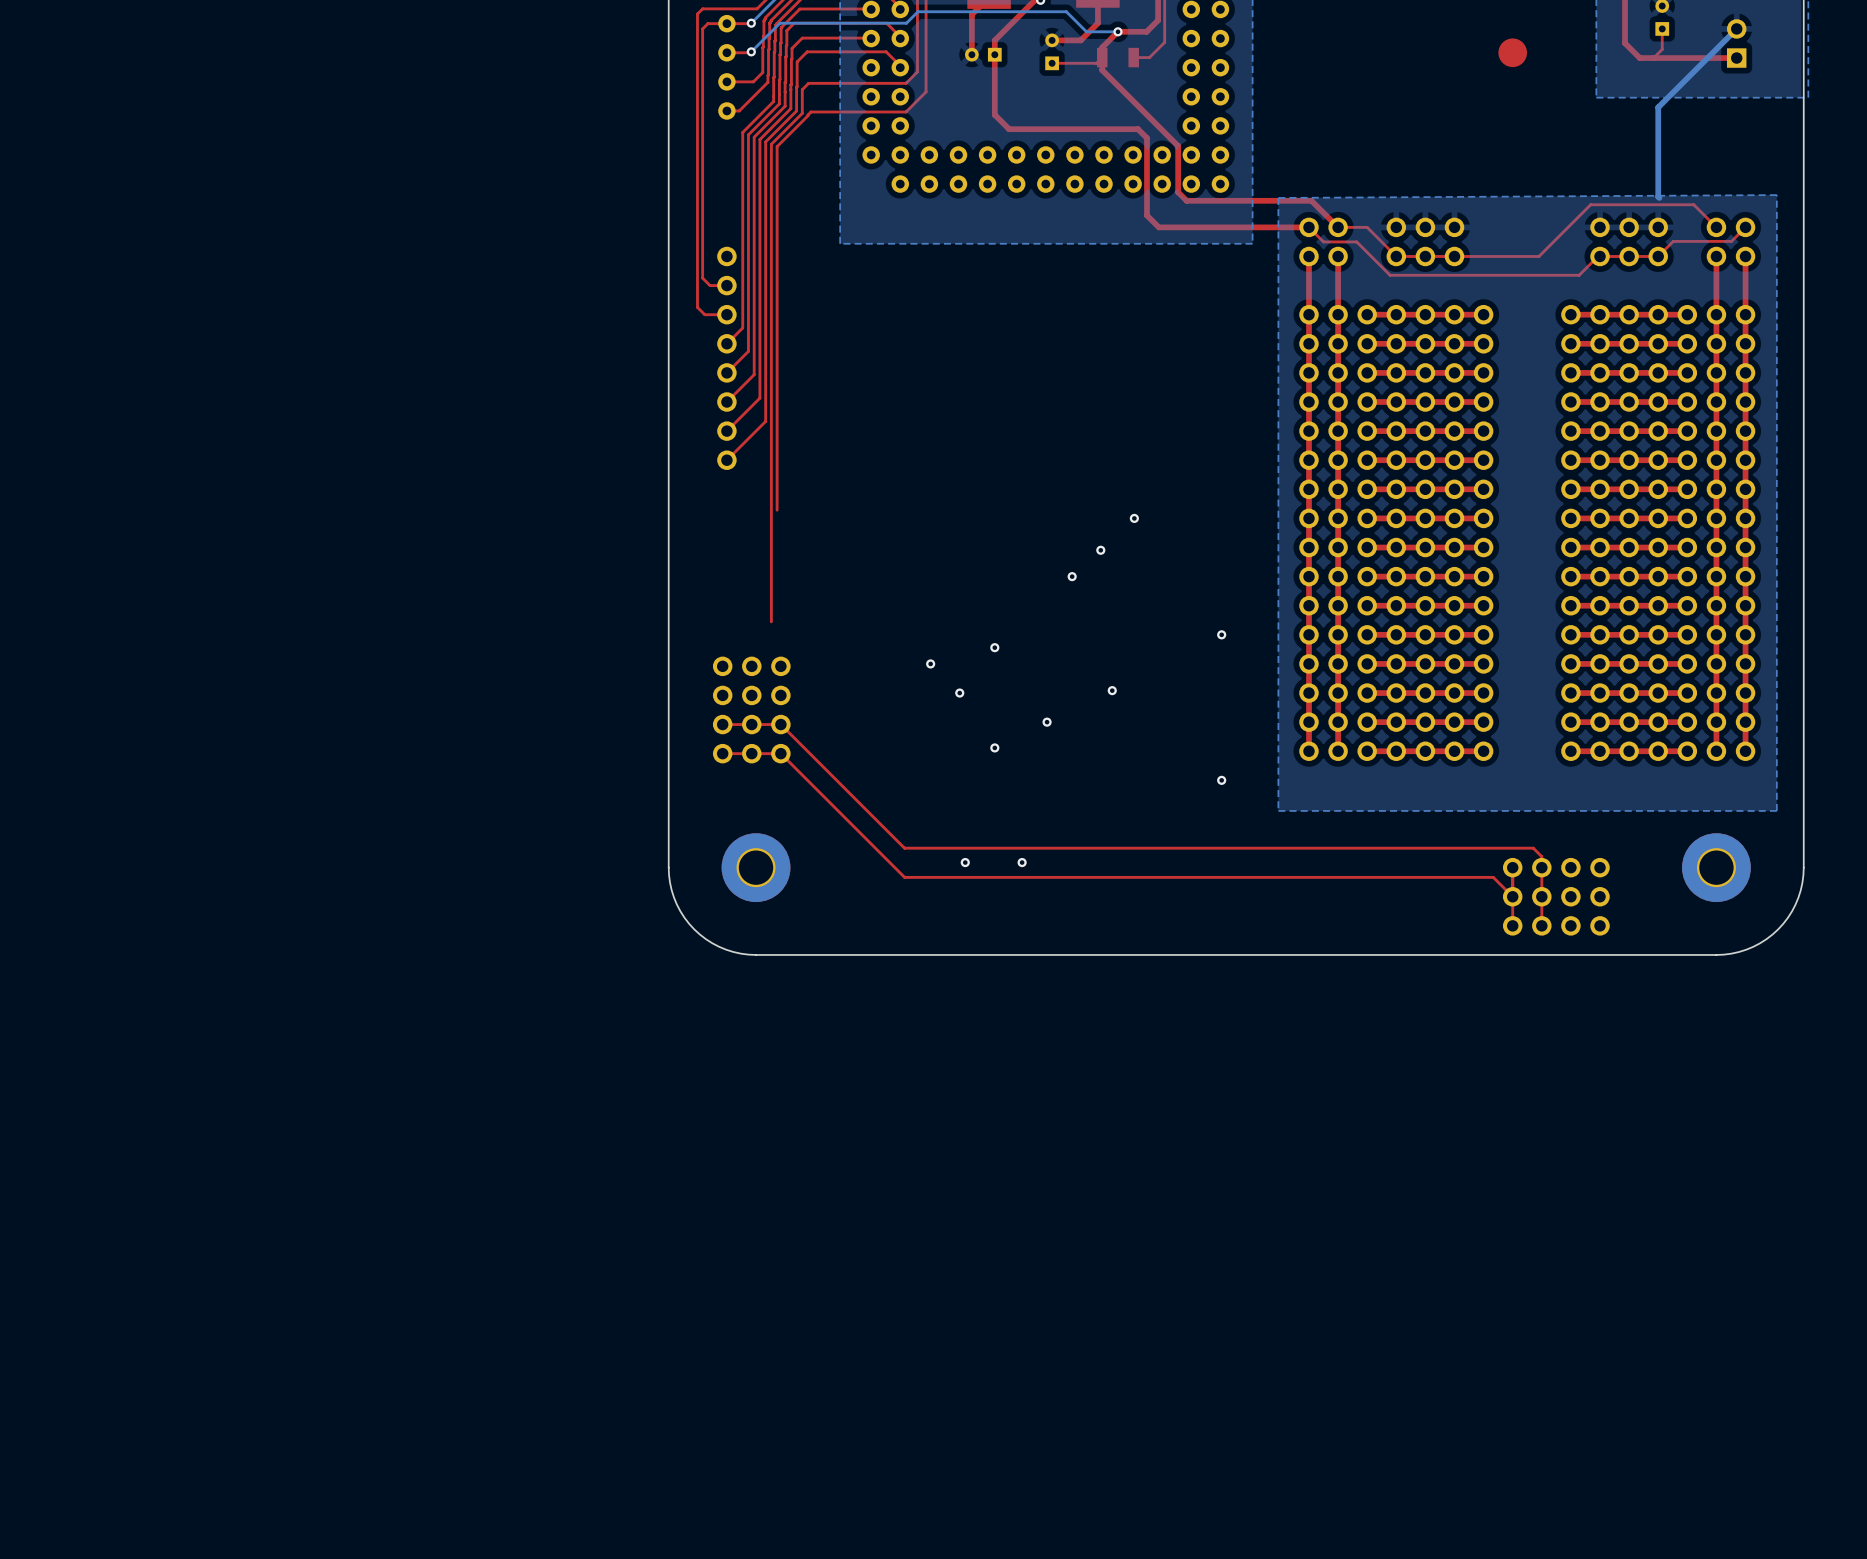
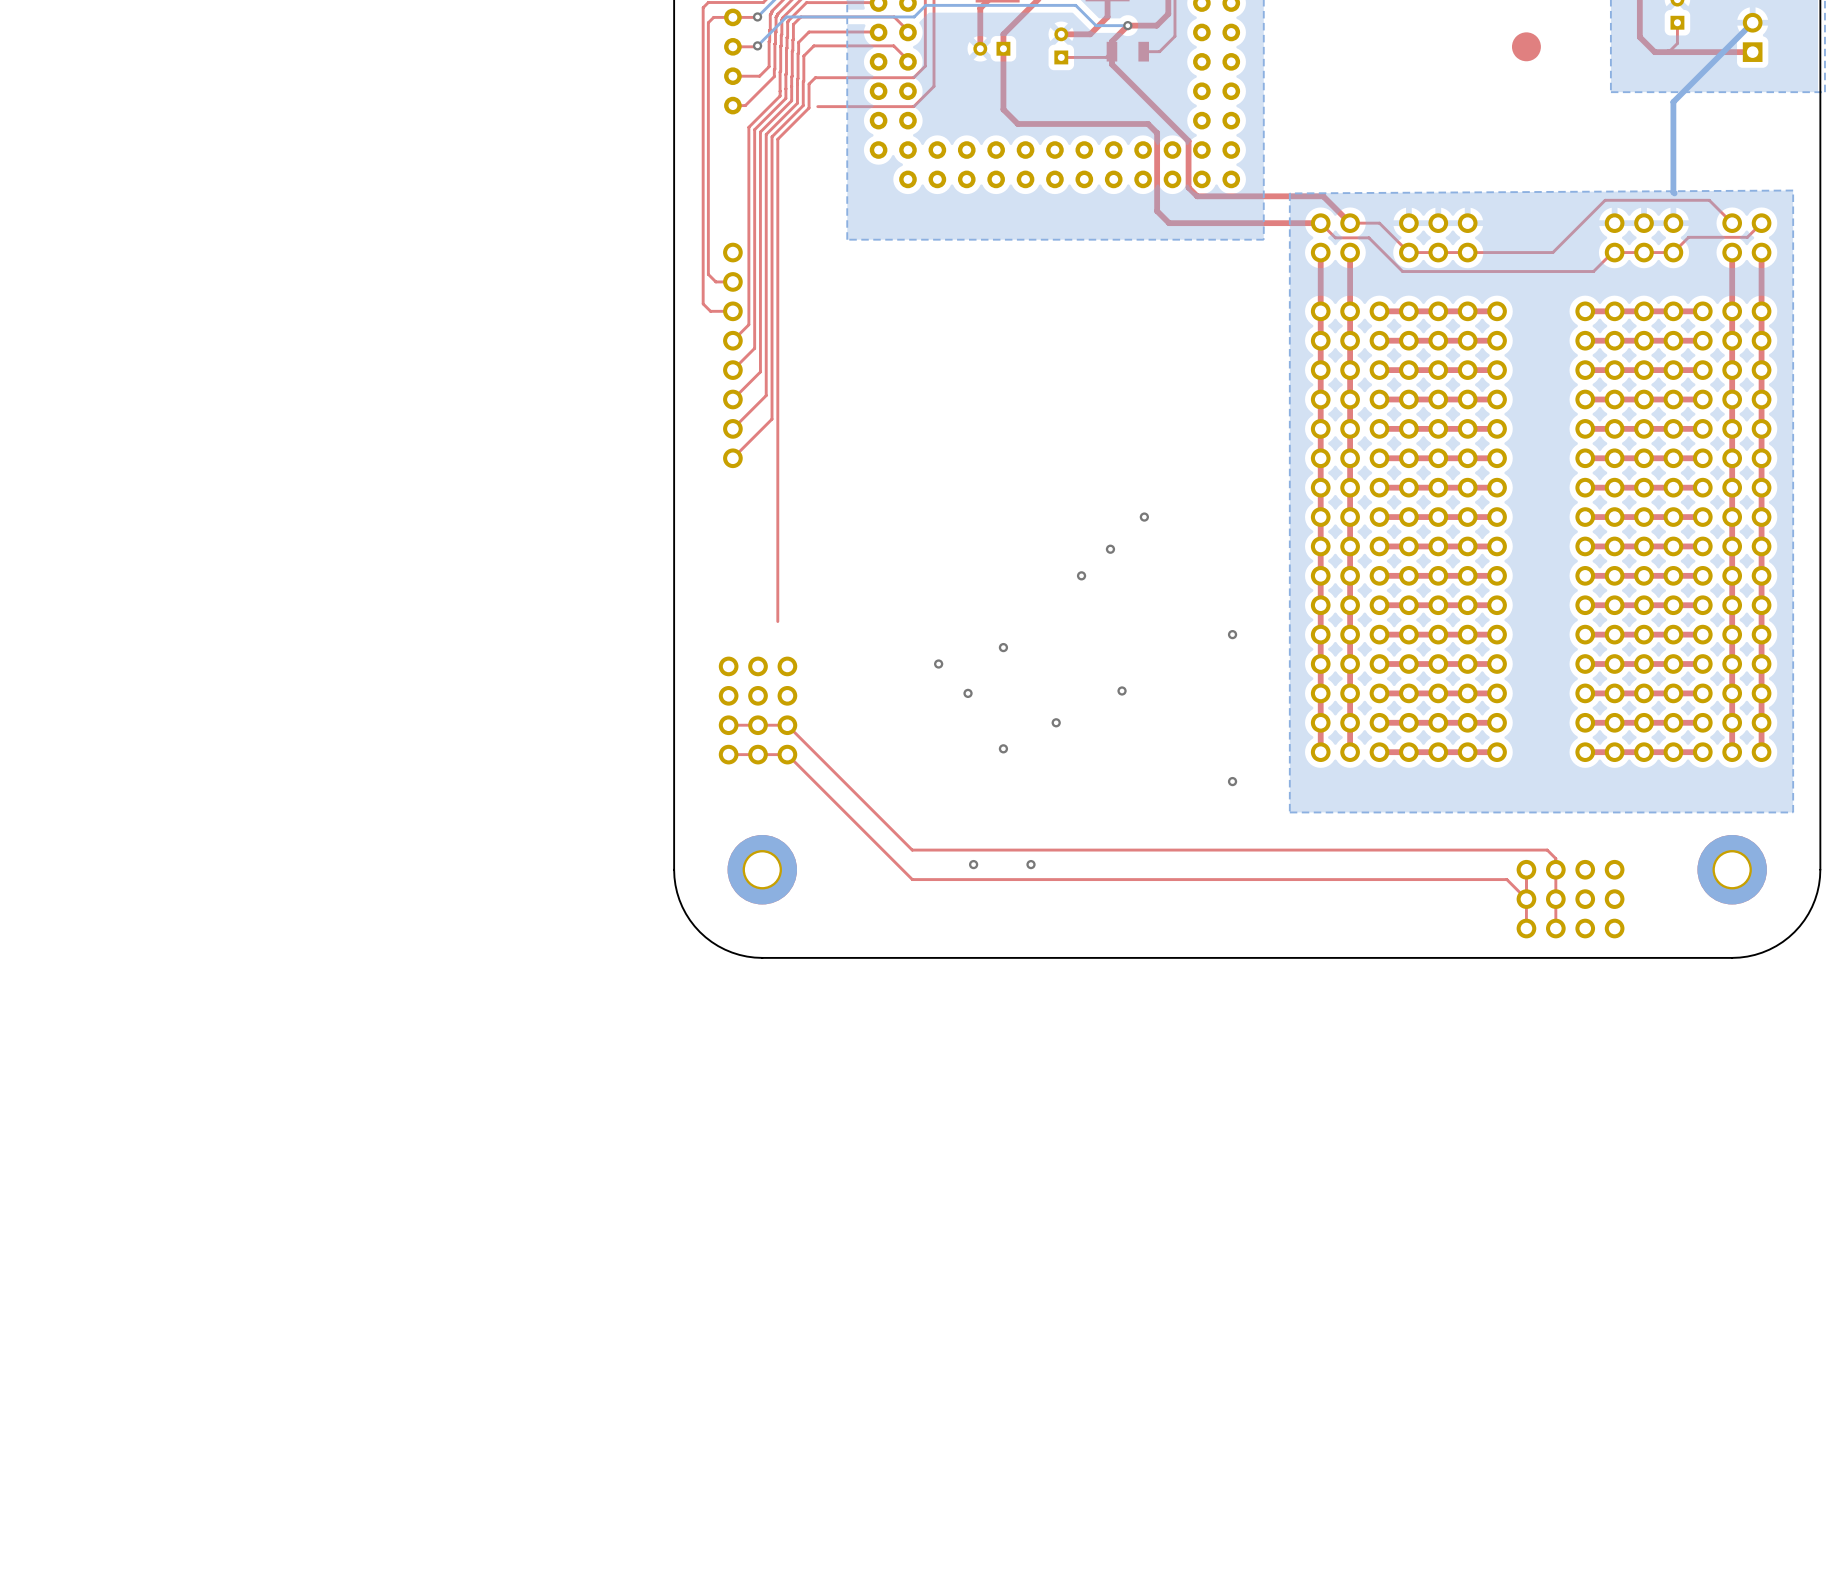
top track: (810, 112) (777, 146) (777, 510) -> none

